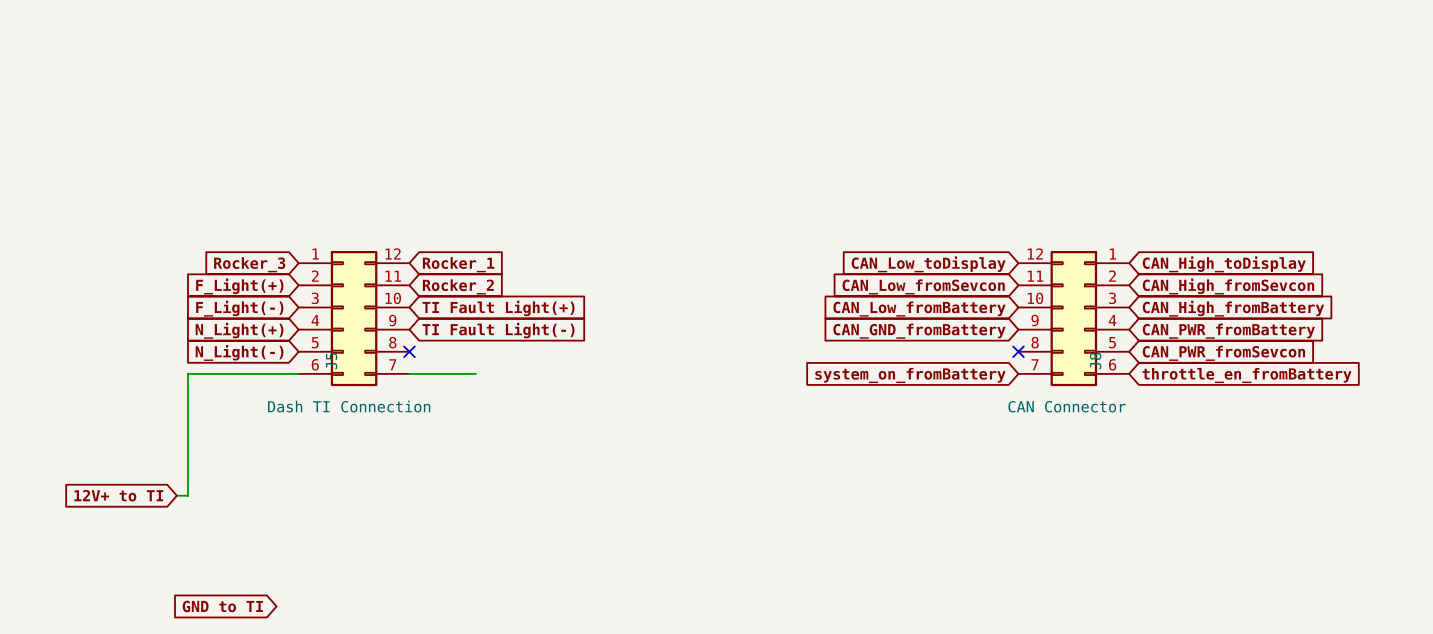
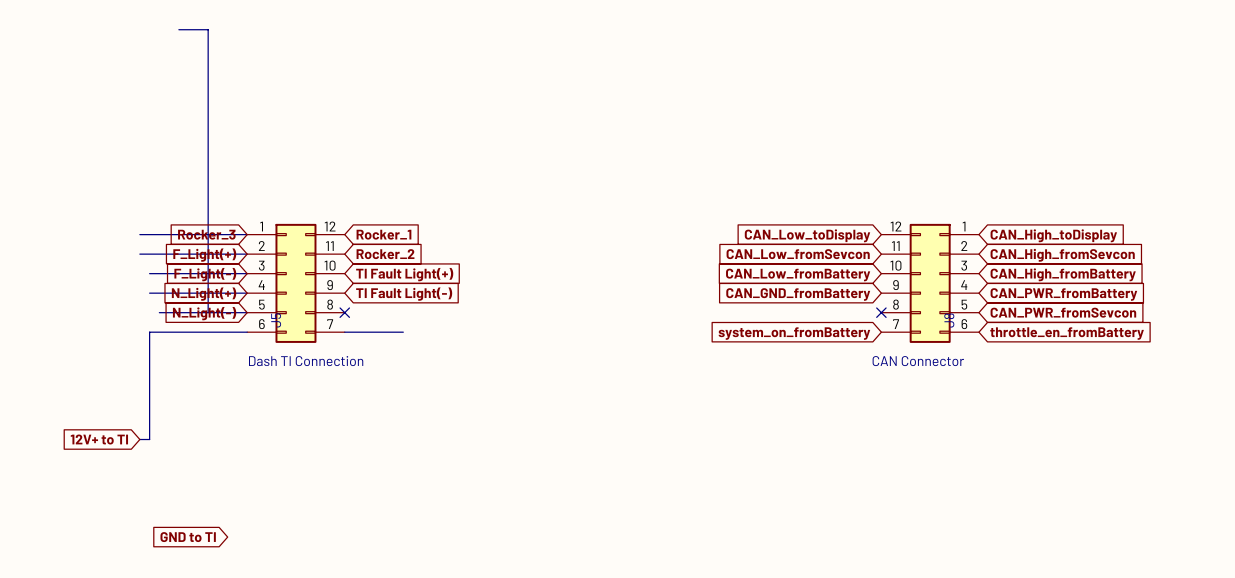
bus: none -> (178, 29) (208, 29) (208, 312)
wire: none -> (139, 234) (247, 234)
wire: none -> (139, 254) (247, 254)
wire: none -> (149, 273) (247, 273)
wire: none -> (149, 293) (247, 293)
wire: none -> (159, 312) (247, 312)

